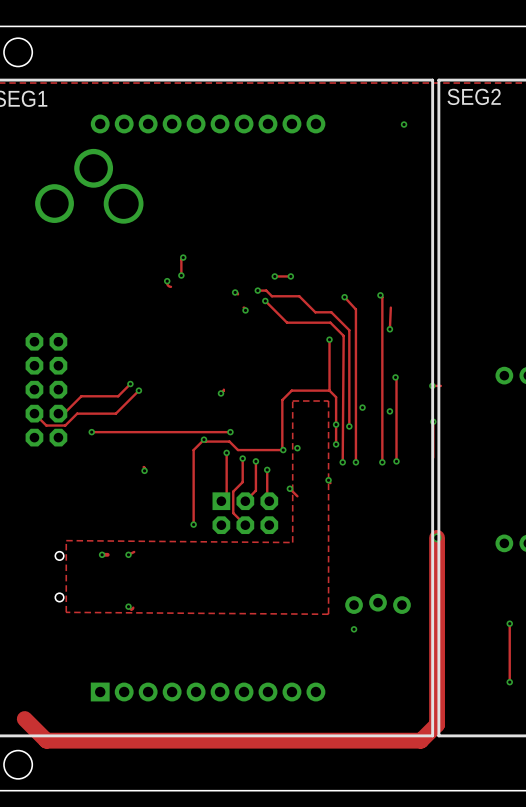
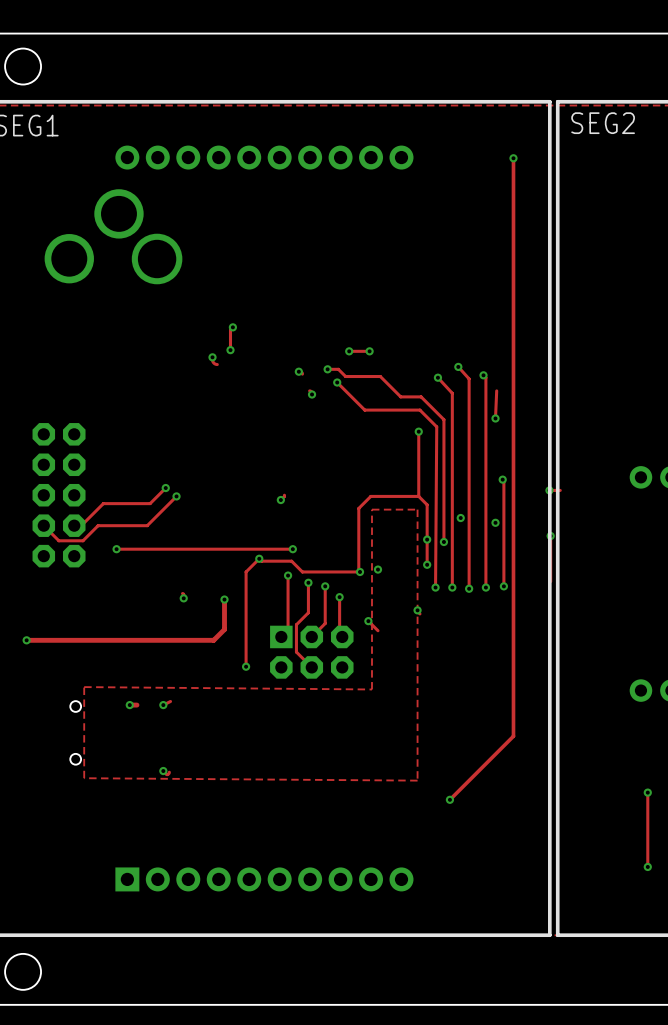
track: none -> (513, 158) (513, 736) (449, 799)
track: none -> (458, 366) (469, 378) (469, 588)
via: none -> (458, 366)
via: none -> (469, 588)
track: none -> (224, 599) (224, 629) (213, 640) (26, 640)
via: none -> (224, 599)
via: none -> (26, 640)
track: (437, 537) (437, 724) (421, 740) (46, 740) (24, 718) -> none
via: (437, 537) -> none
part: (378, 603) -> none

